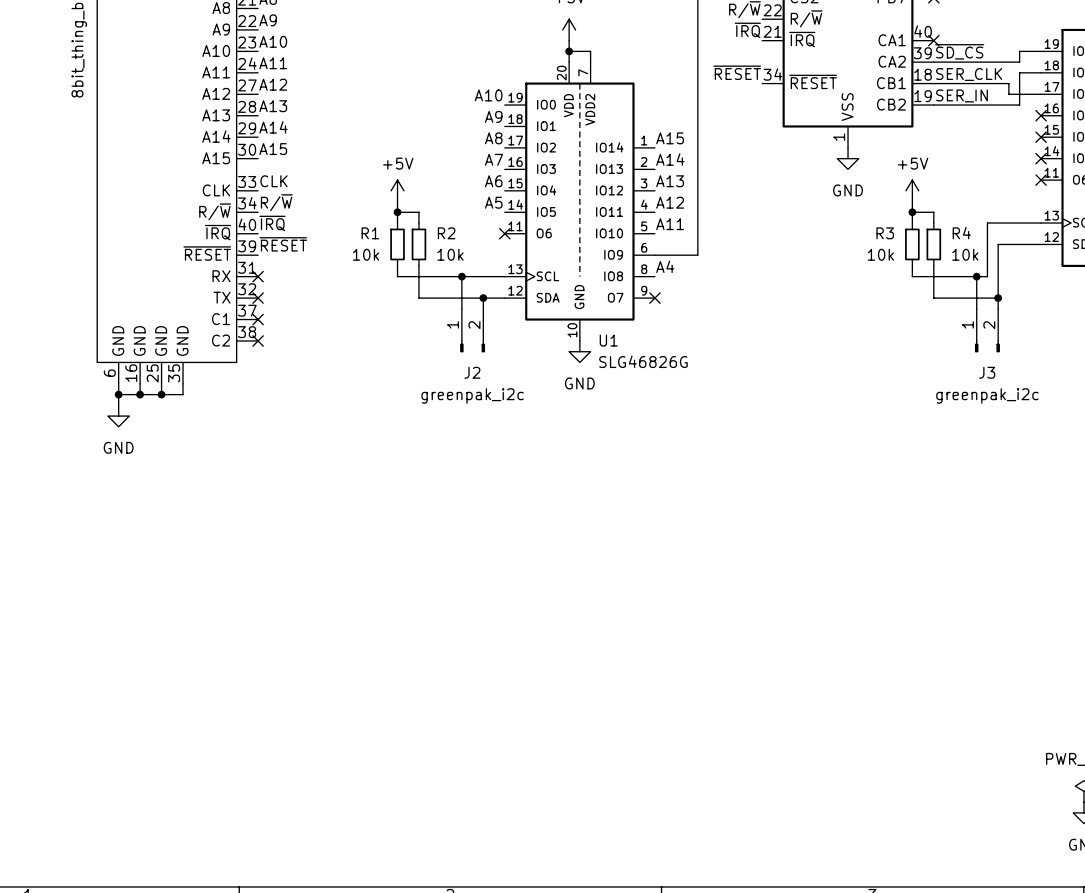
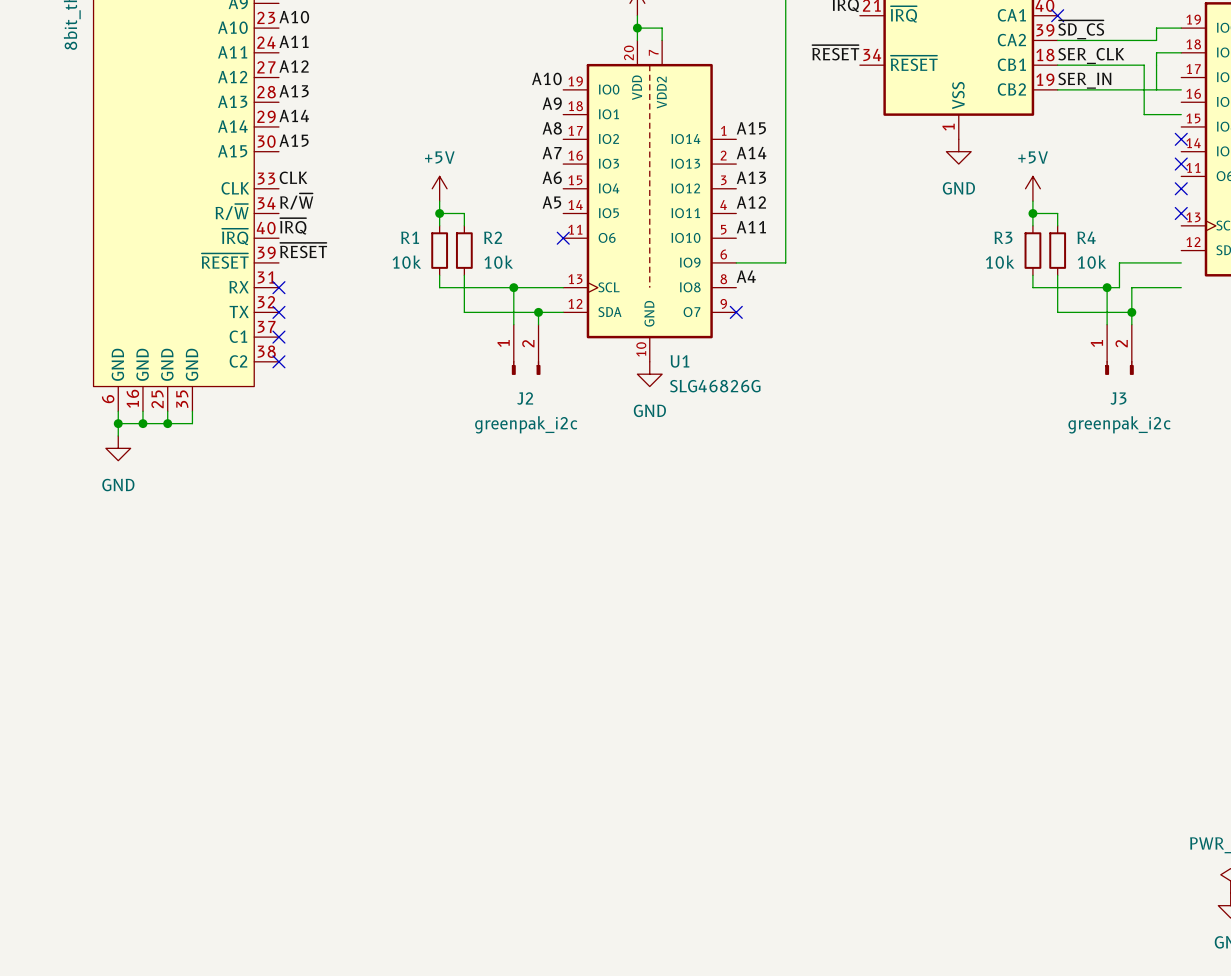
wire: (1008, 94) (1041, 94) -> (1144, 77) (1144, 114) (1181, 114)
wire: none -> (1156, 89) (1181, 89)
no-connect mark: (1041, 115) -> none
no-connect mark: (1041, 137) -> none
no-connect mark: none -> (1181, 139)
no-connect mark: (1041, 158) -> none
no-connect mark: none -> (1181, 164)
no-connect mark: (1041, 180) -> none
no-connect mark: none -> (1181, 188)
no-connect mark: none -> (1181, 213)
wire: (1041, 223) (987, 223) (987, 255) -> (1181, 262) (1119, 262)
wire: (1041, 244) (998, 244) (998, 276) -> (1181, 287) (1131, 287)

